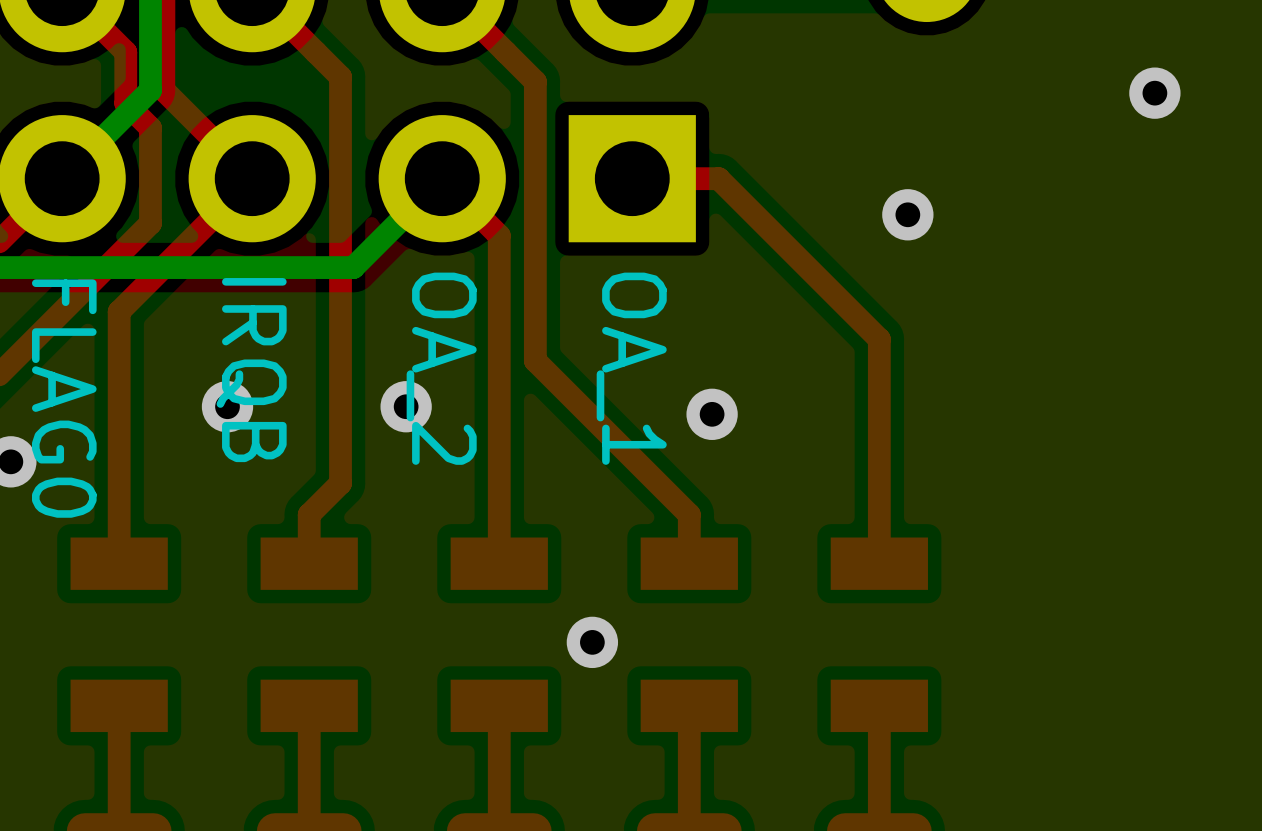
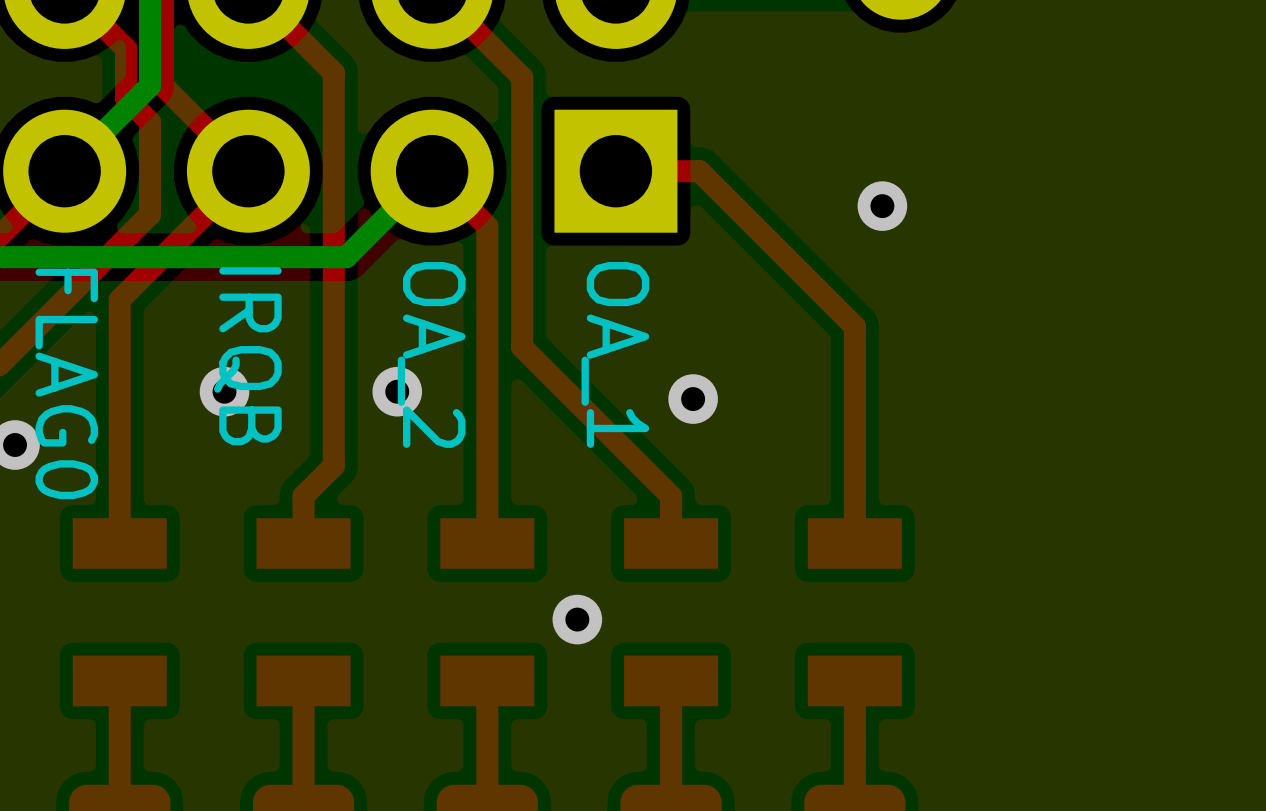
via: (1154, 93) -> none

